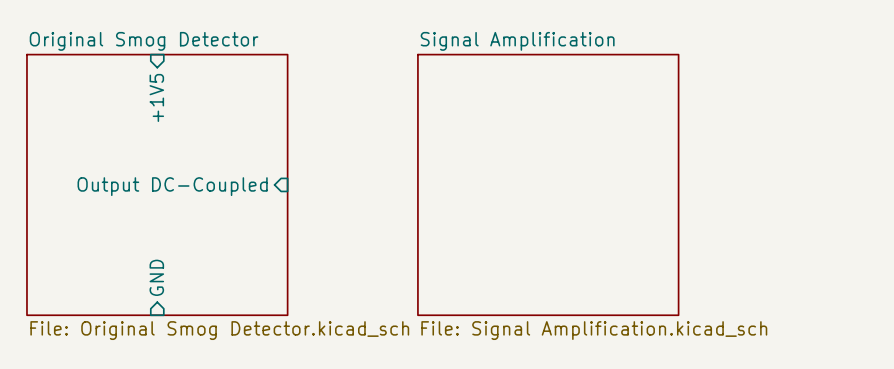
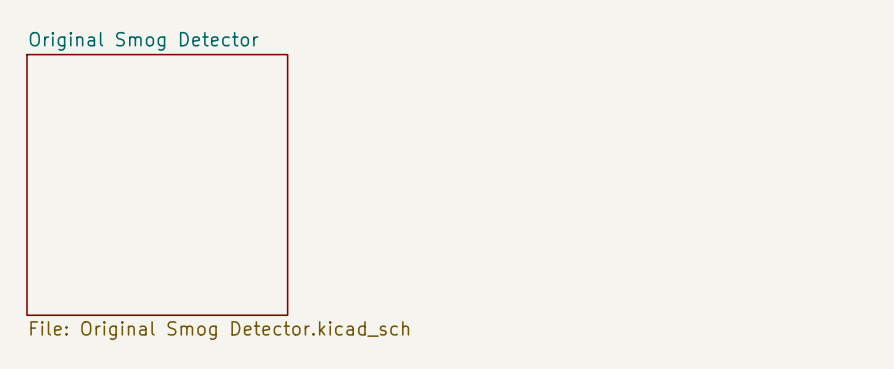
sheet pin: +1V5 (156, 97) -> none
sheet Signal Amplification: File: Signal Amplification.kicad_sch (548, 184) -> none
sheet pin: Output DC-Coupled (172, 186) -> none
sheet pin: GND (156, 277) -> none

